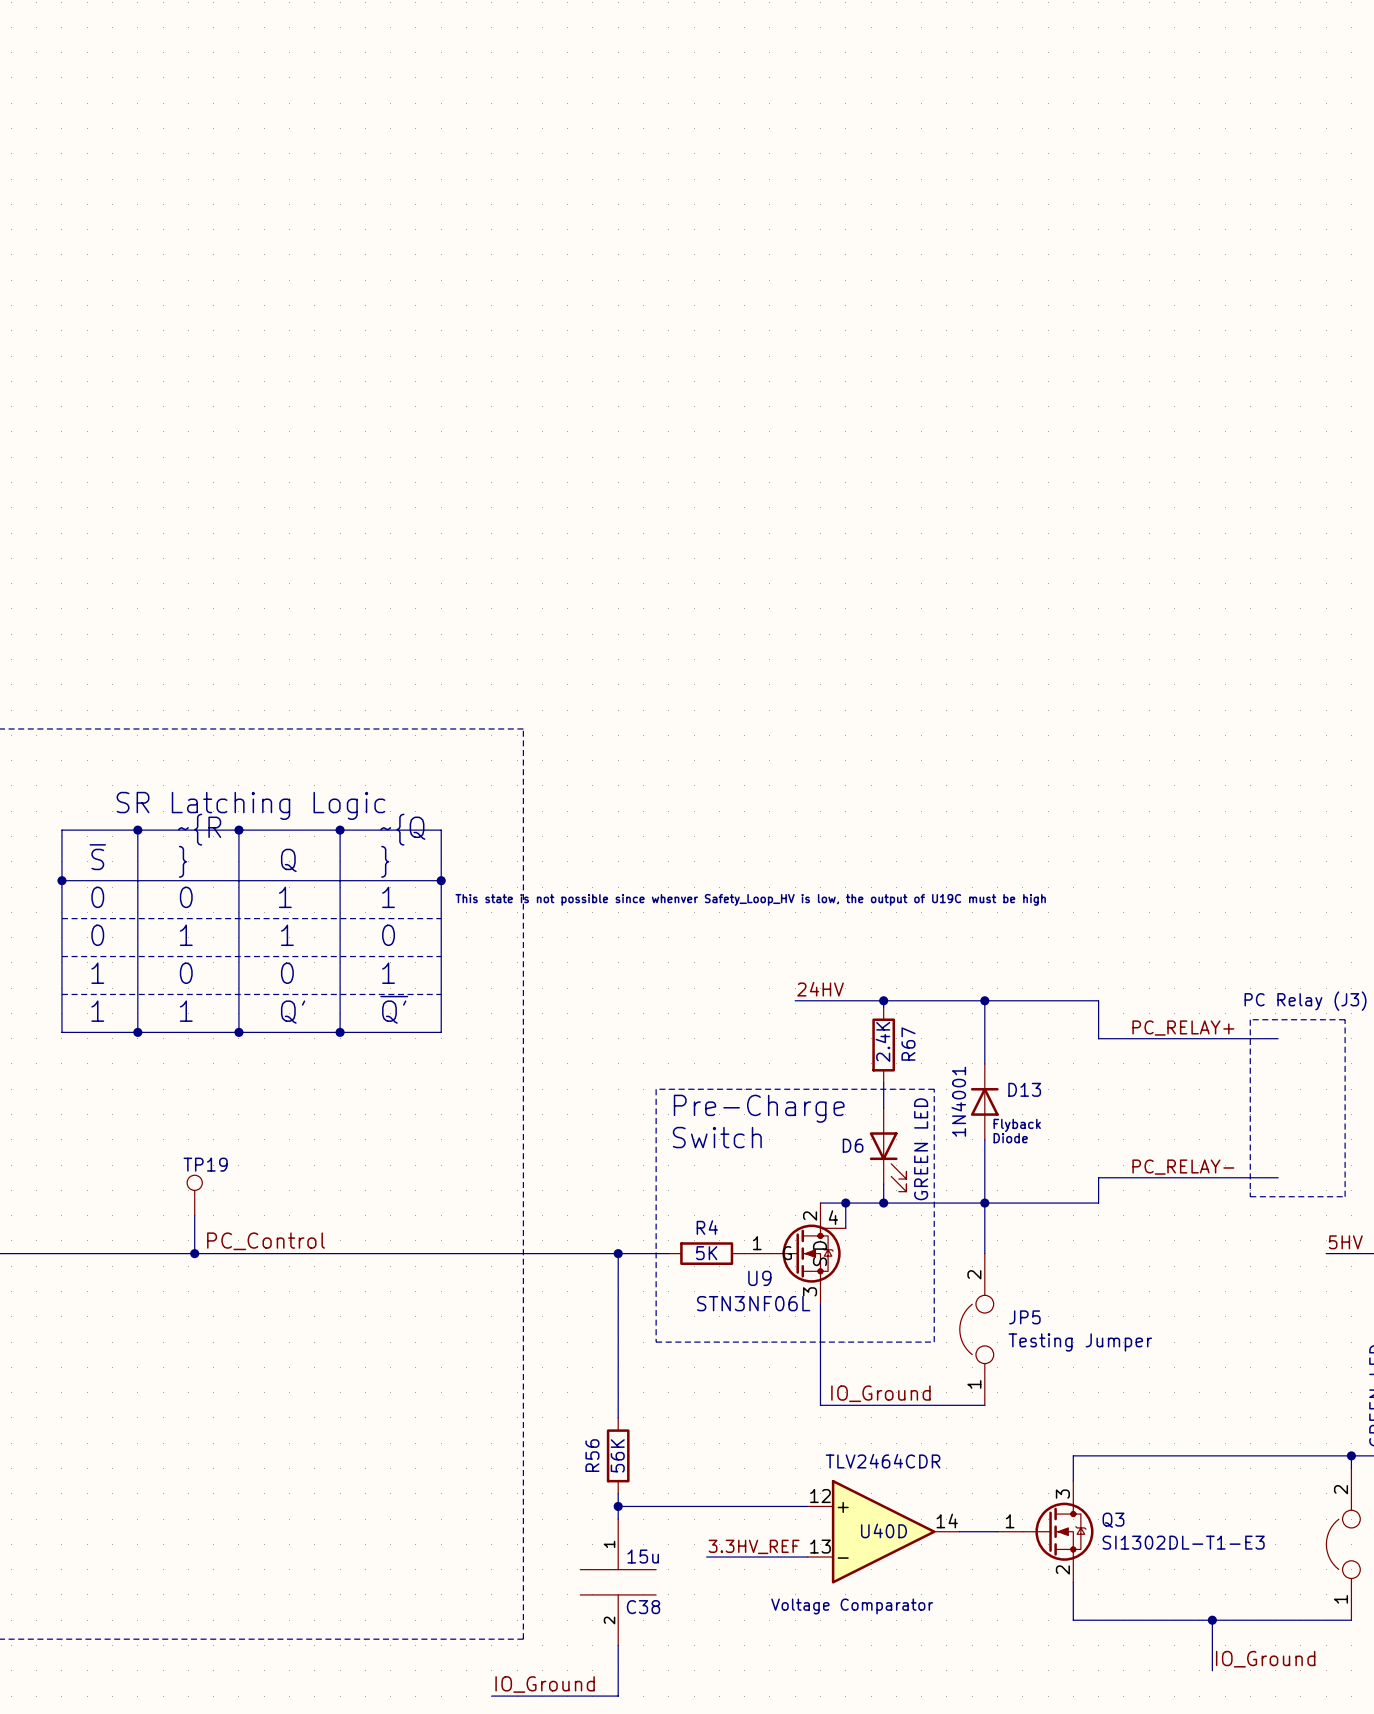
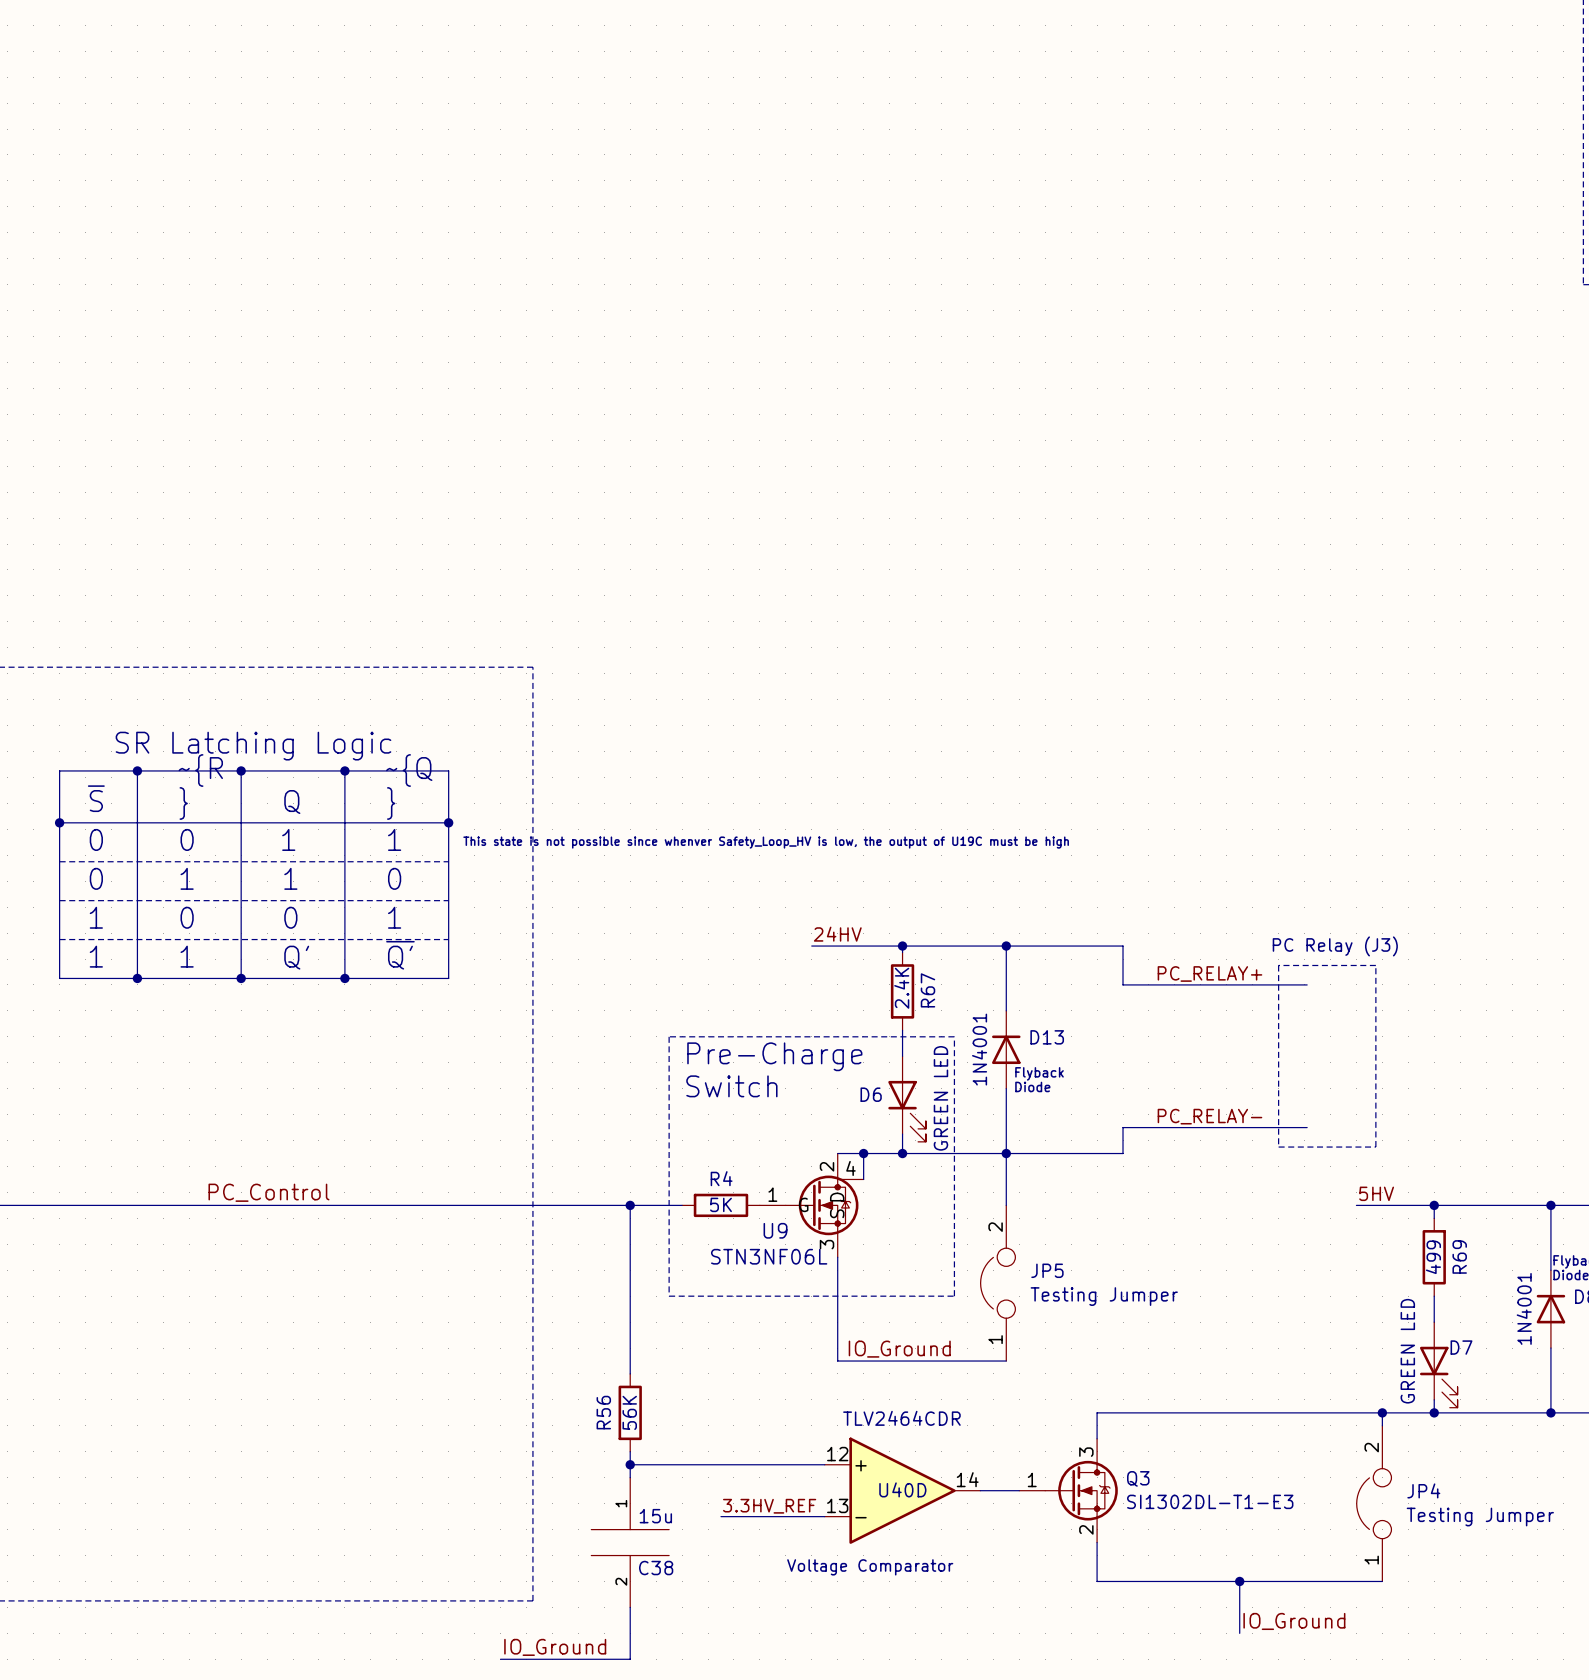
TP19: (194, 1195) -> none
wire: (194, 1215) (194, 1253) -> none
junction: (194, 1253) -> none

